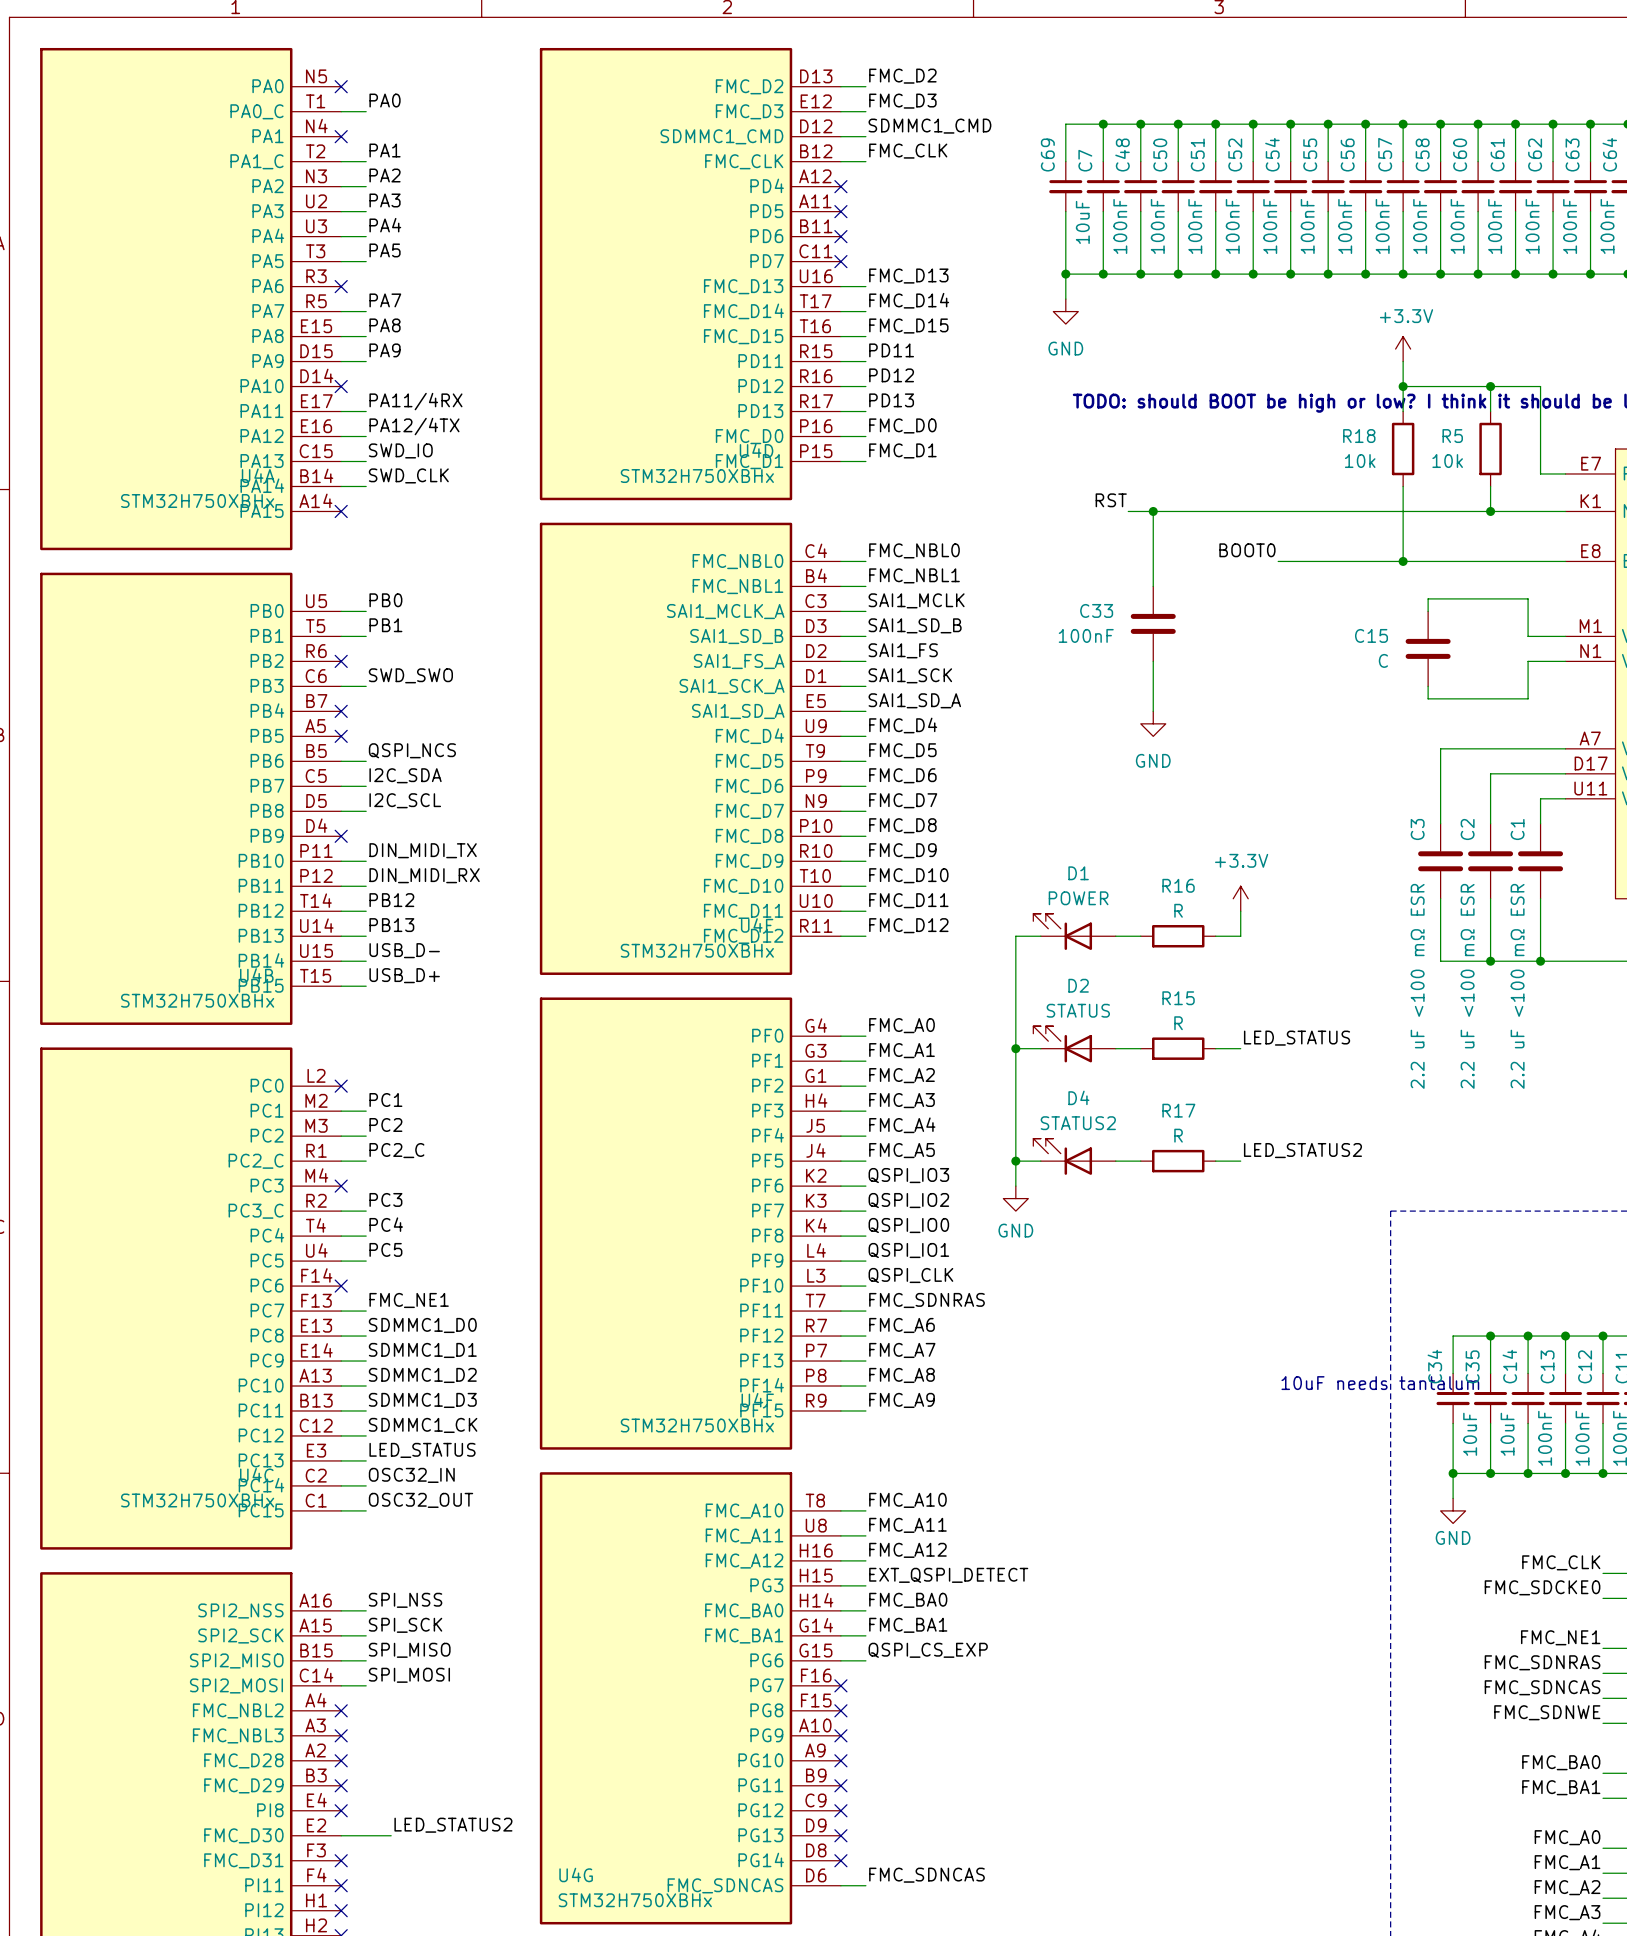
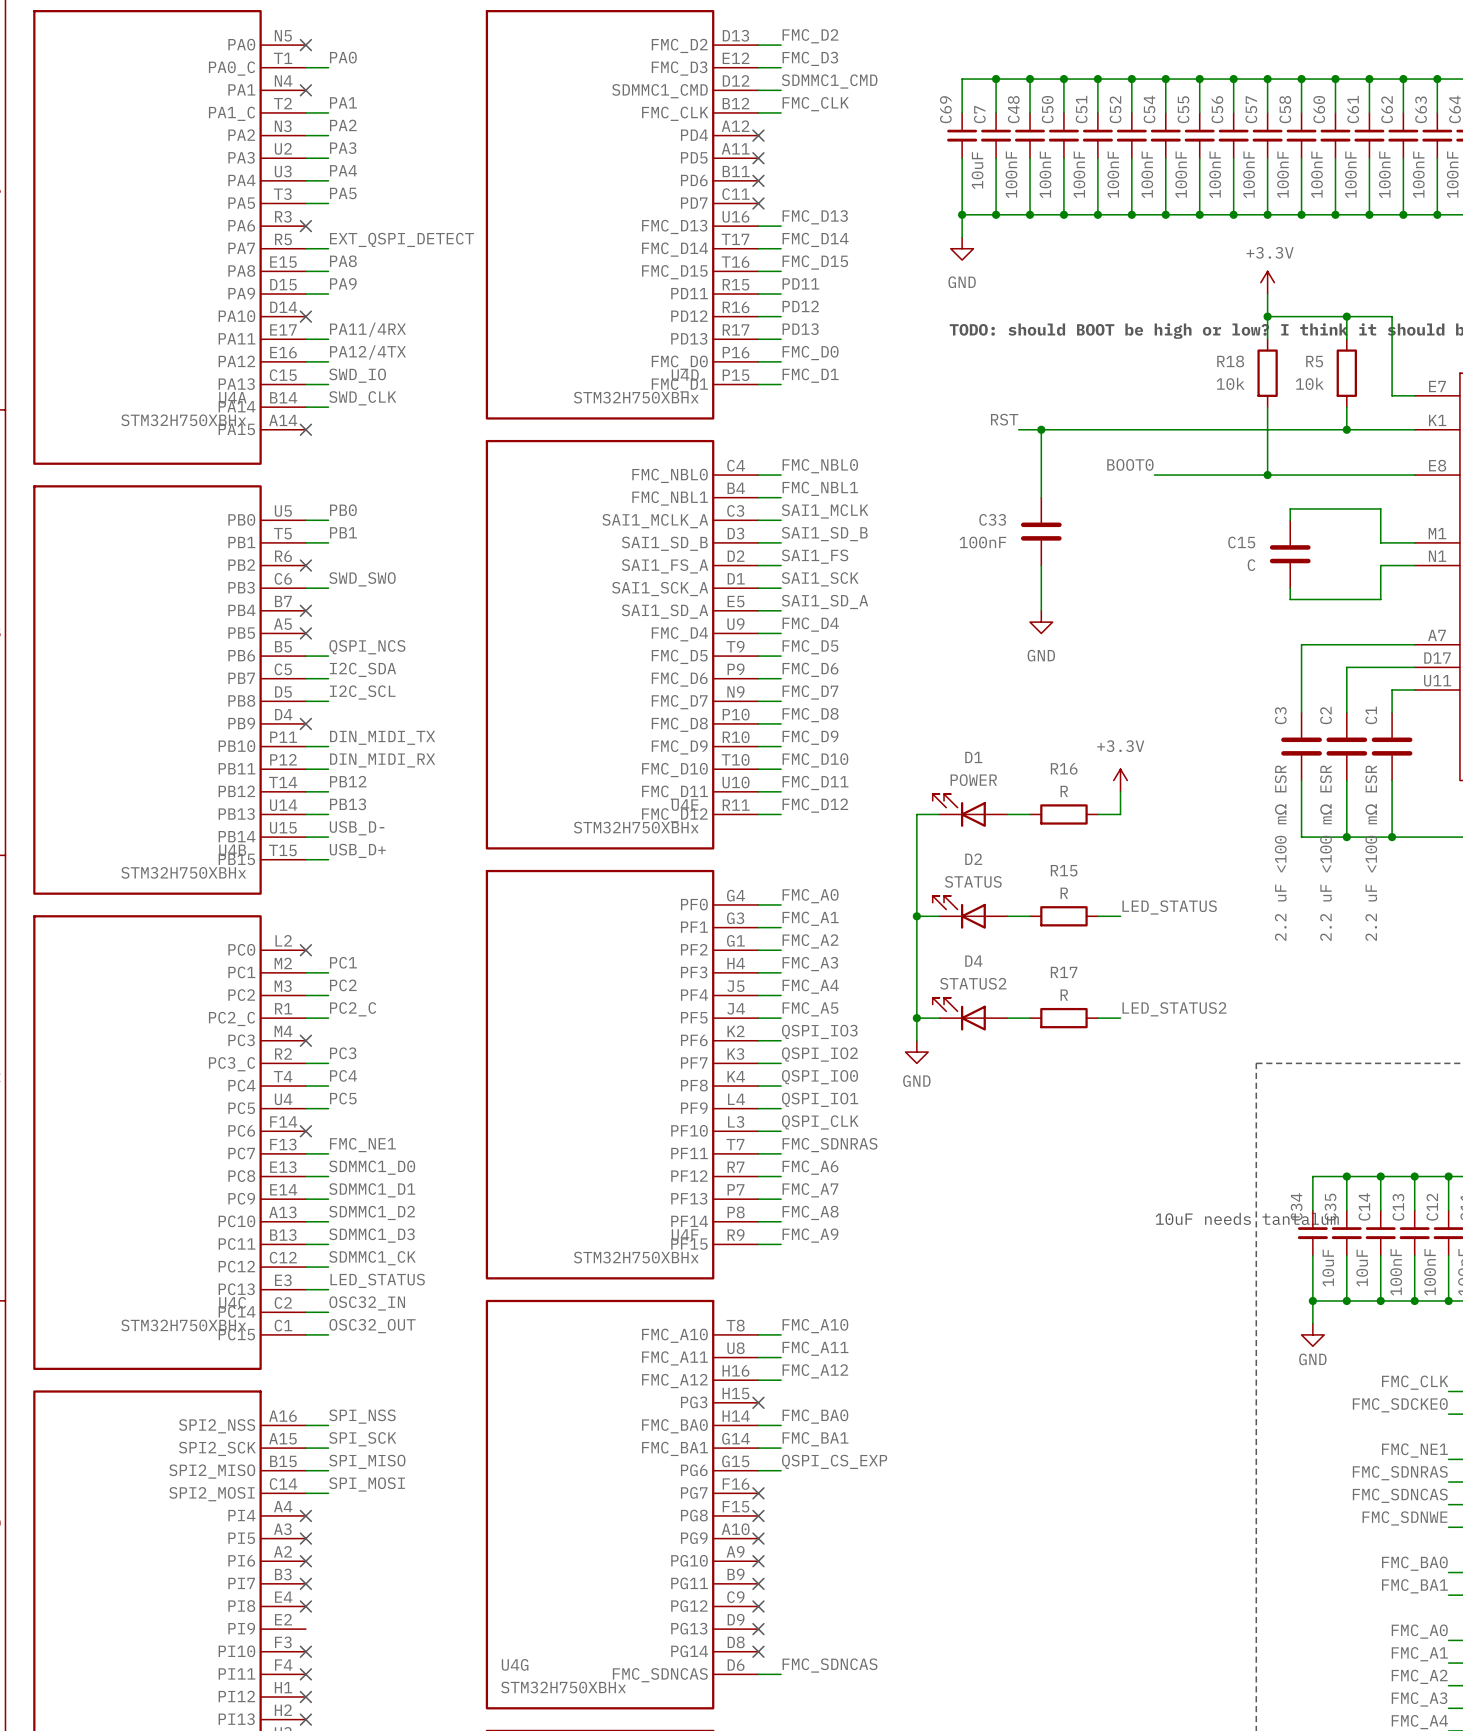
label: PA7 (385, 300) -> EXT_QSPI_DETECT (401, 239)
label: EXT_QSPI_DETECT (948, 1575) -> none
wire: (840, 1585) (865, 1585) -> none
no-connect mark: none -> (758, 1402)
part pin name: FMC_NBL2 (238, 1710) -> PI4 (241, 1515)
part pin name: FMC_NBL3 (238, 1735) -> PI5 (241, 1538)
part pin name: FMC_D28 (243, 1760) -> PI6 (241, 1560)
part pin name: FMC_D29 (243, 1785) -> PI7 (241, 1583)
label: LED_STATUS2 (453, 1825) -> none
part pin name: FMC_D30 (243, 1835) -> PI9 (241, 1628)
wire: (341, 1835) (391, 1835) -> none
part pin name: FMC_D31 (243, 1860) -> PI10 (236, 1651)

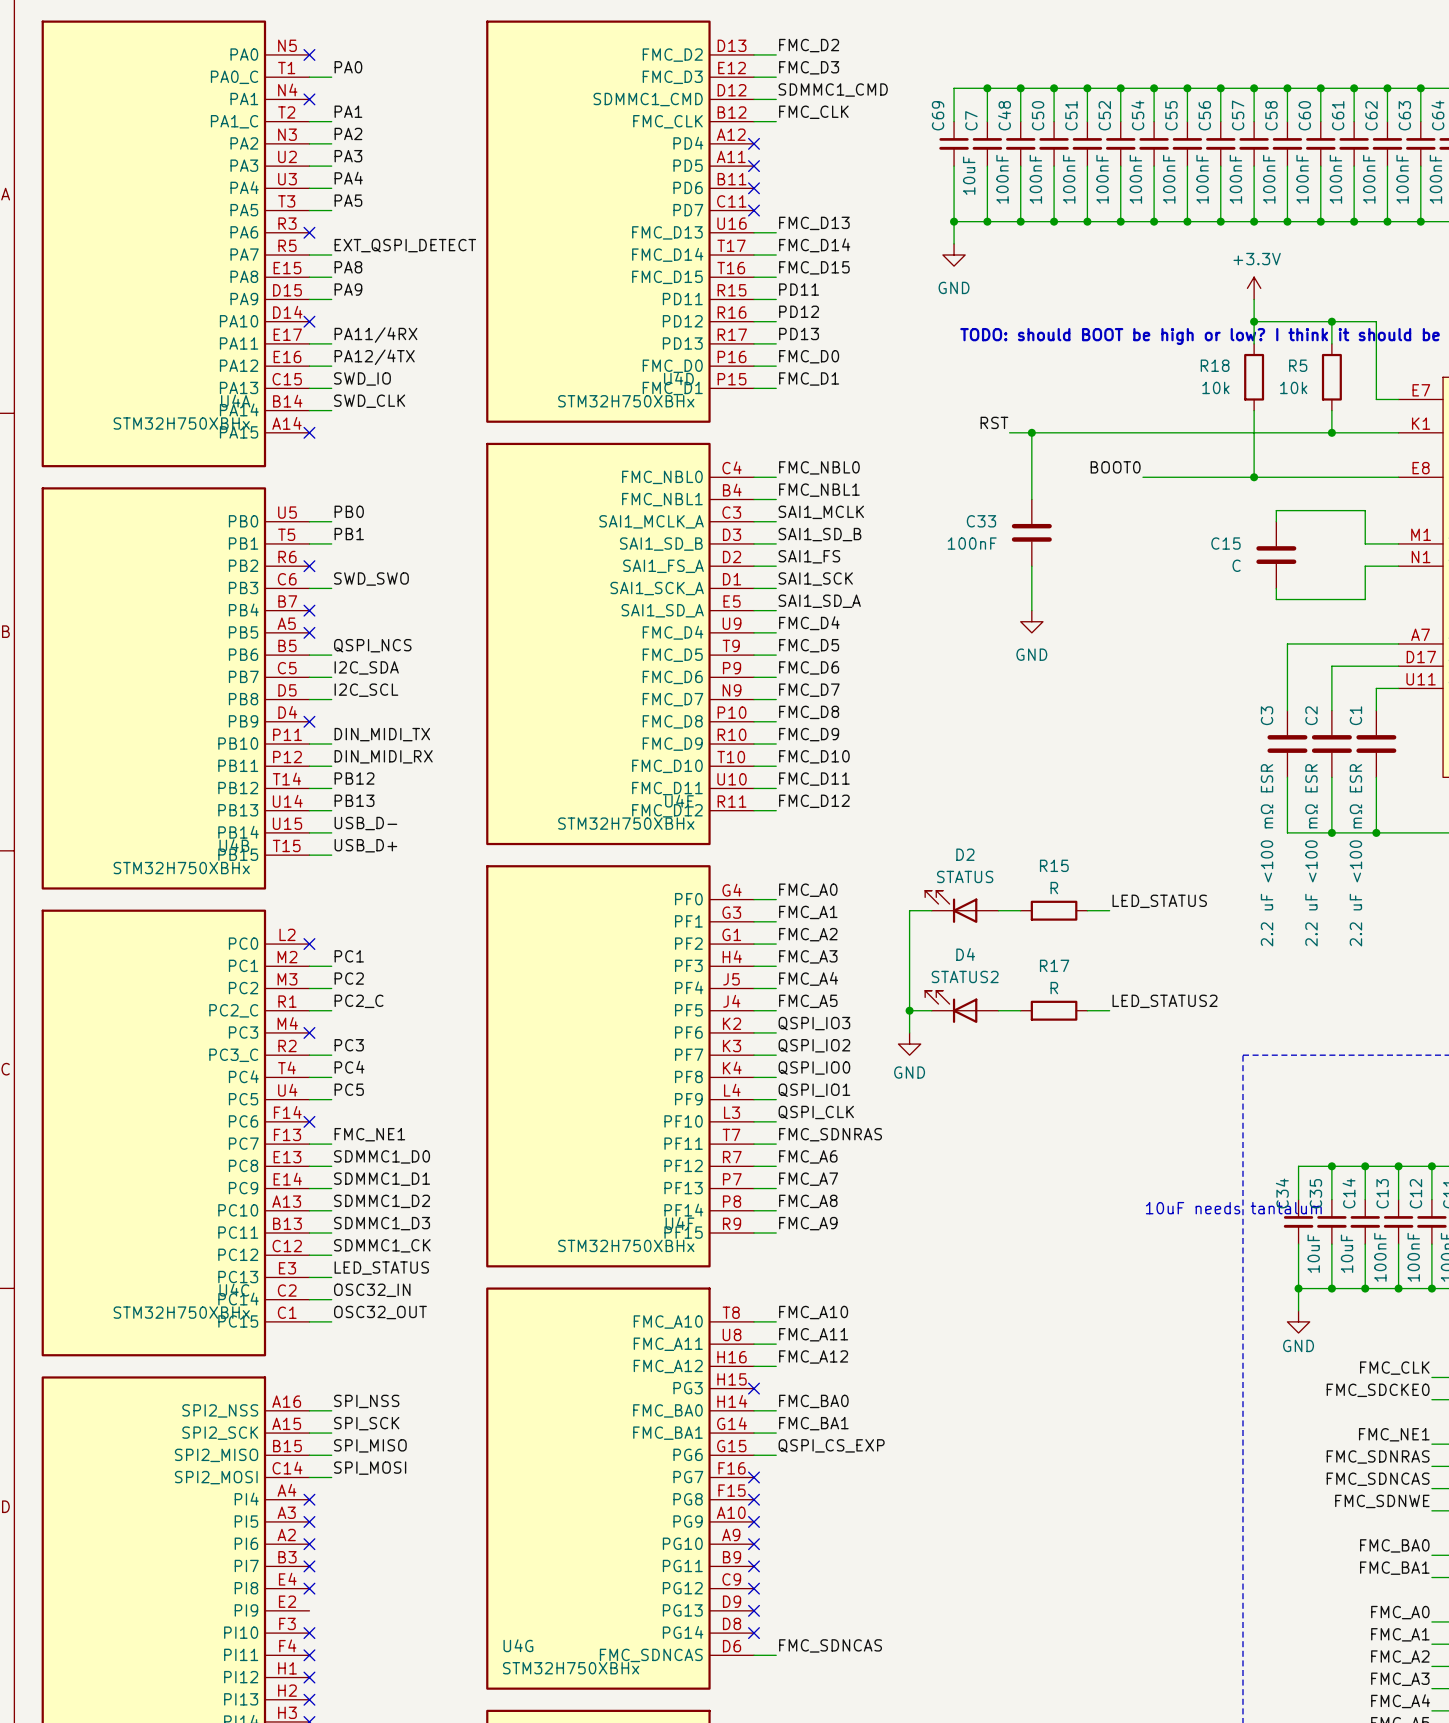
power symbol: +3.3V (1120, 780) -> none
wire: (1120, 791) (1120, 814) (1097, 814) -> none
D1: POWER (970, 810) -> none
wire: (939, 814) (916, 814) (916, 916) -> none
wire: (1007, 814) (1030, 814) -> none
R16: R (1063, 814) -> none
junction: (916, 916) -> none

